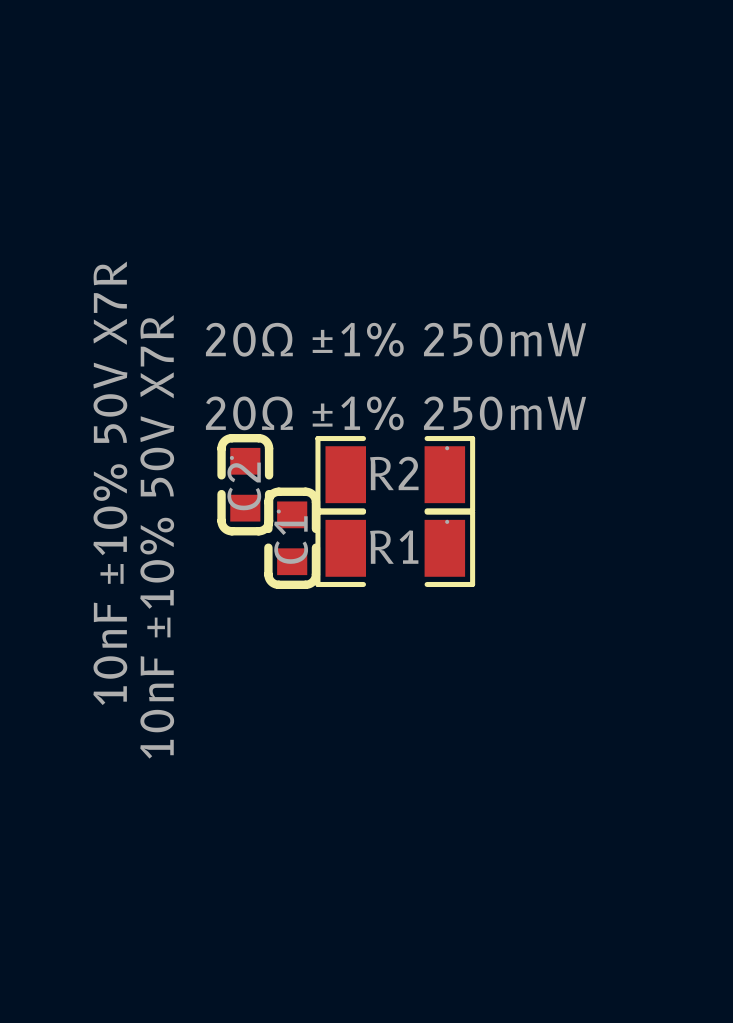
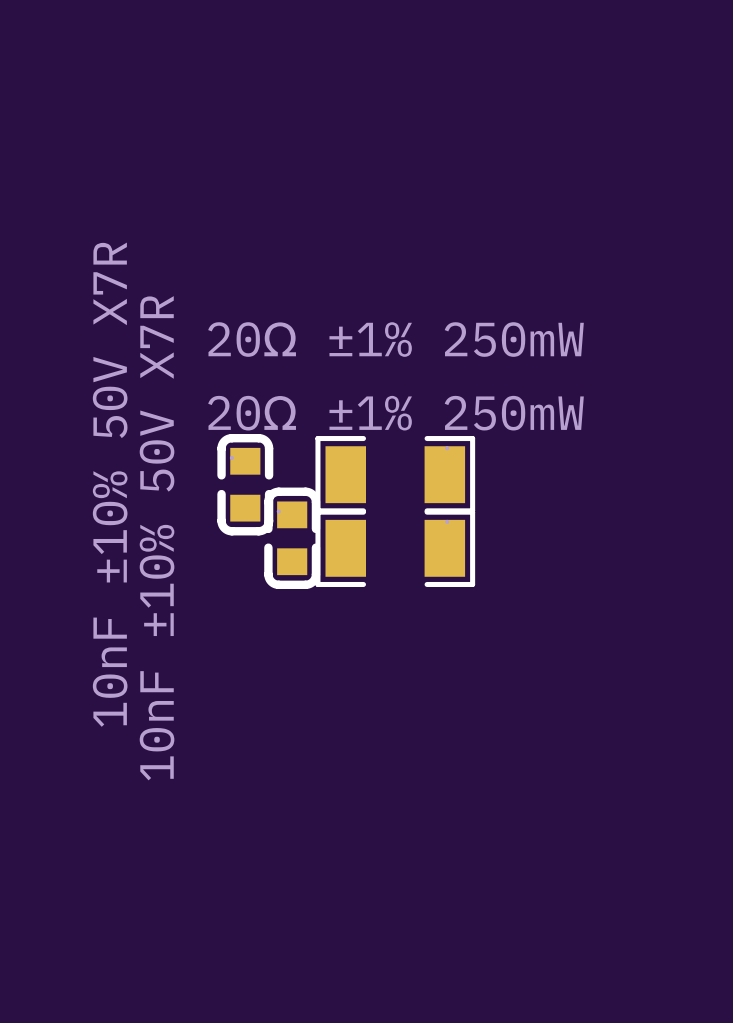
R2 name: R2 (394, 473) -> none
C2 name: C2 (244, 486) -> none
C1 name: C1 (291, 540) -> none
R1 name: R1 (394, 547) -> none

